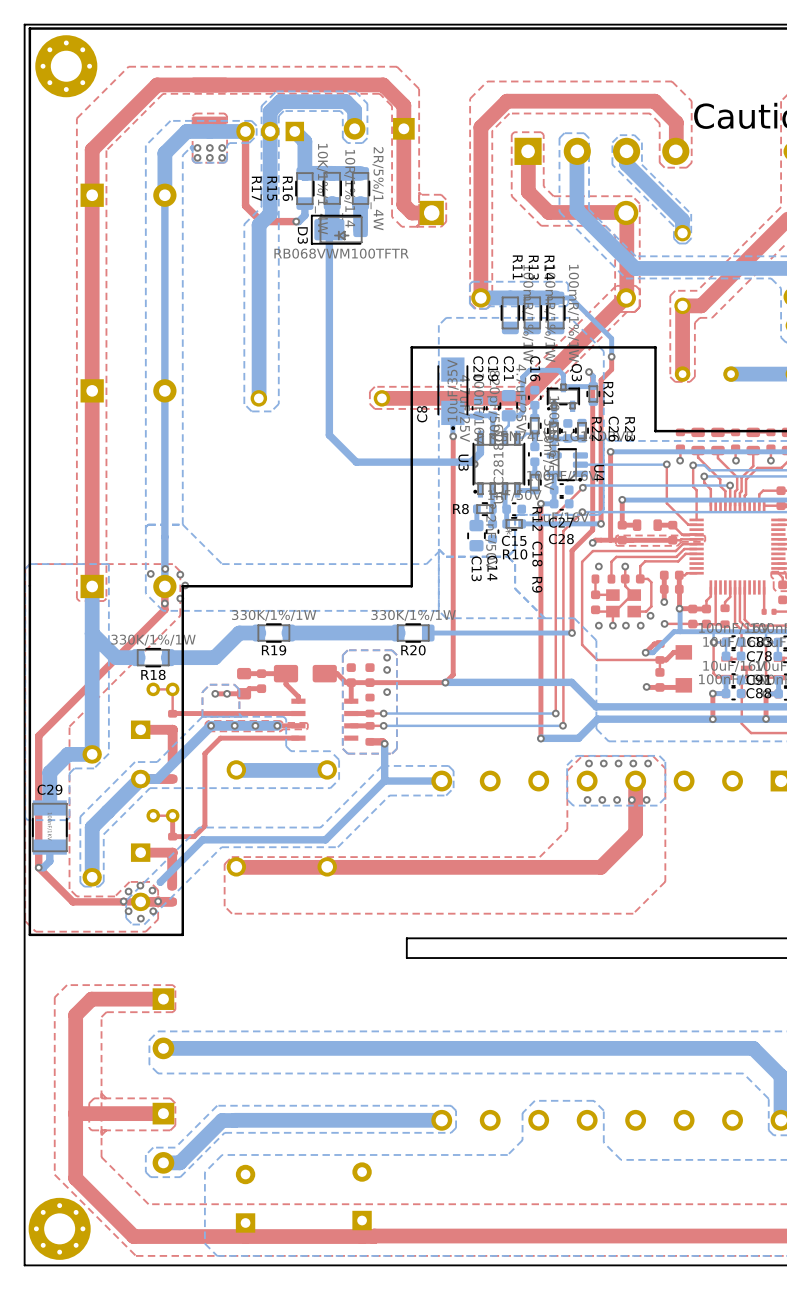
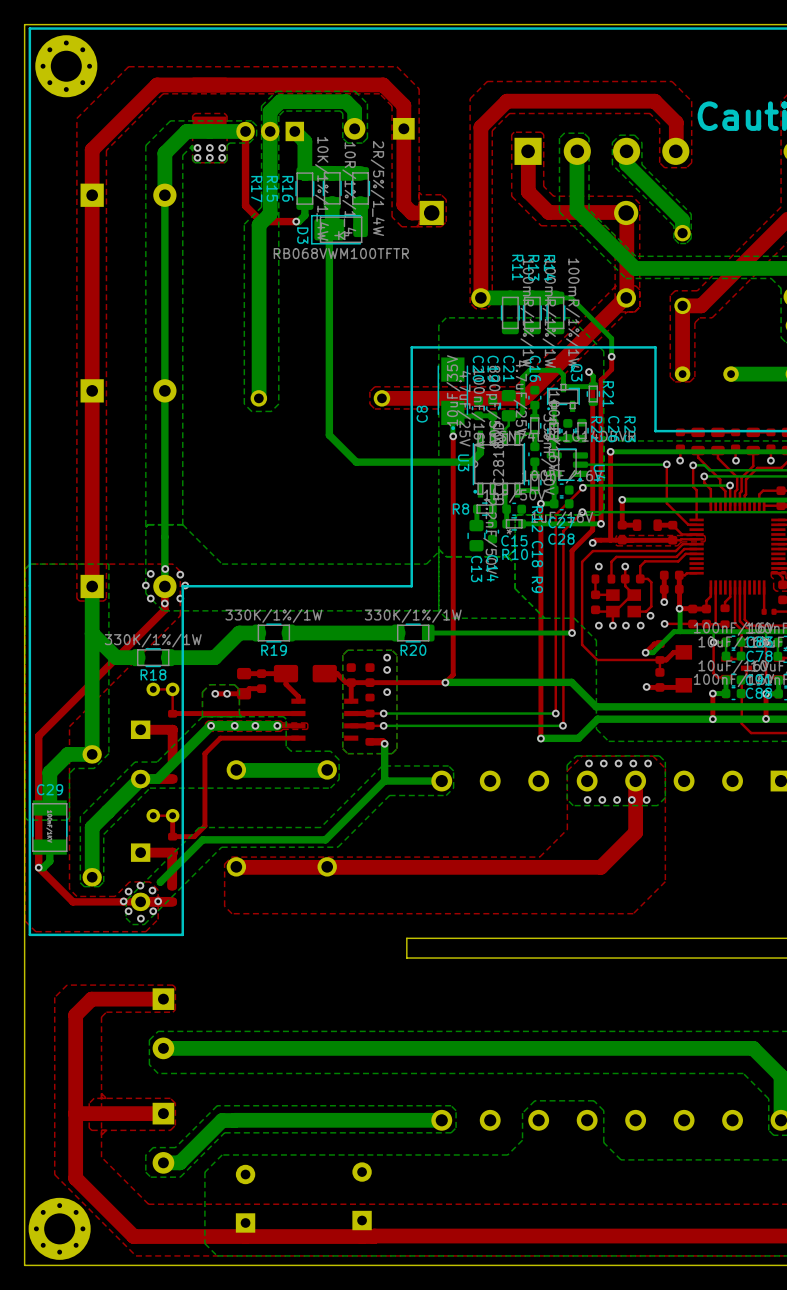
bottom zone outline: (565, 281) (472, 281) (469, 284) (469, 303) (474, 308) (487, 308) (489, 306) (565, 306) (568, 303) (568, 284) (565, 281) -> none
via: none -> (145, 585)
via: none -> (150, 598)

